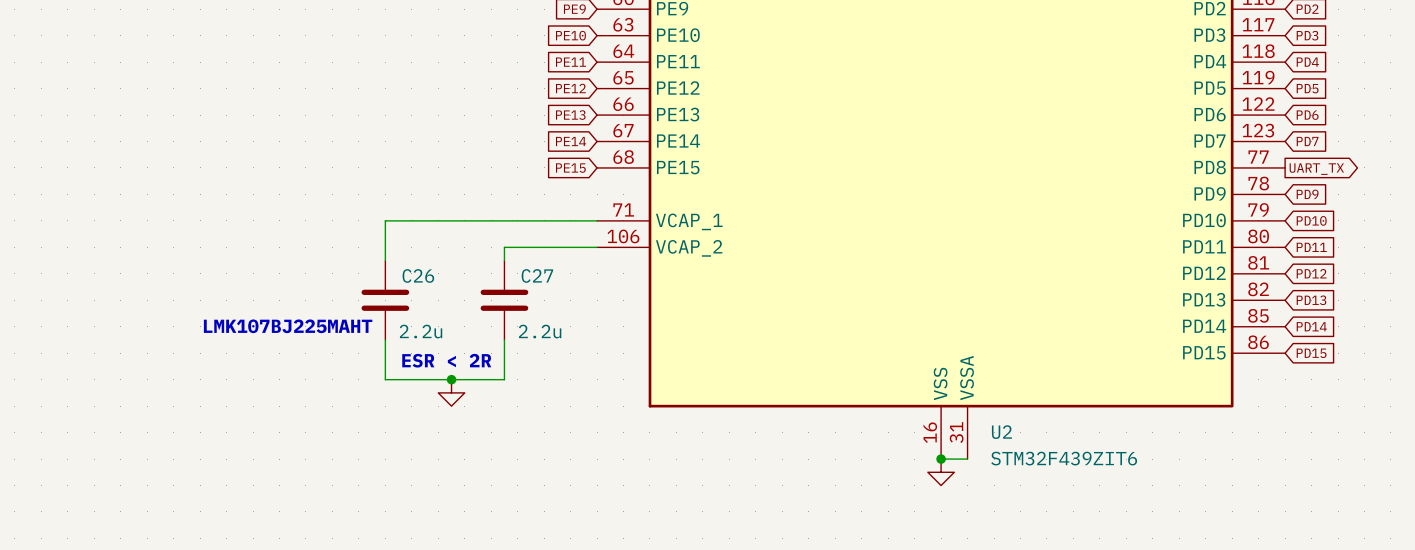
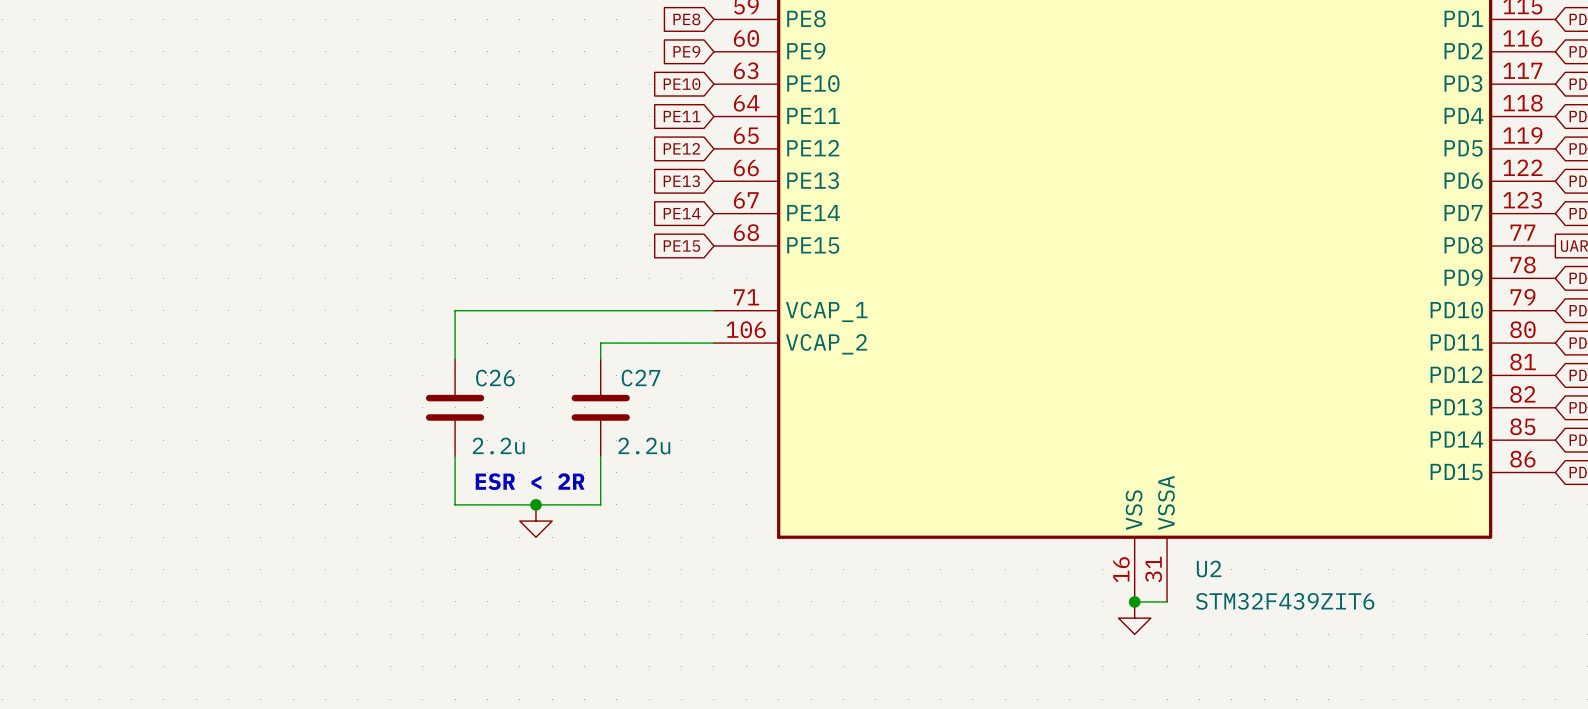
text: LMK107BJ225MAHT (288, 326) -> none

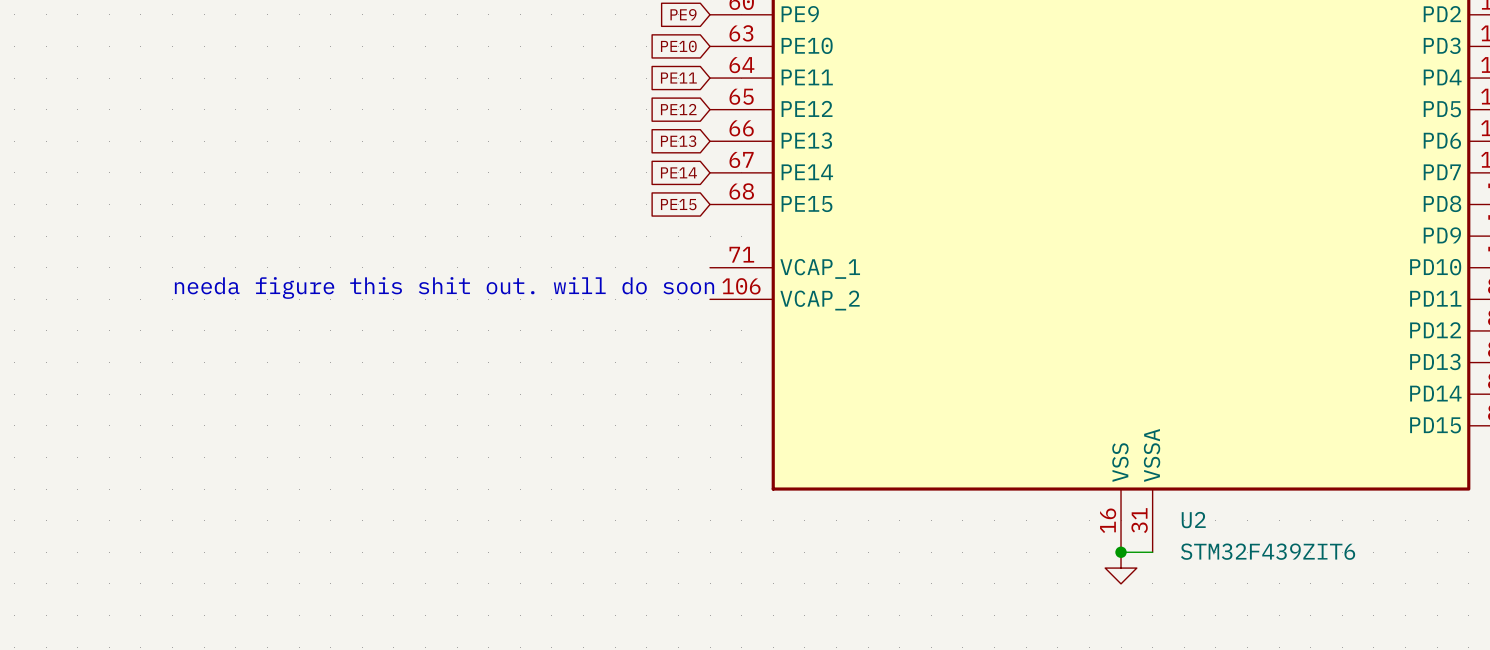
wire: (713, 310) (455, 310) (455, 359) -> none
text: none -> needa figure this shit out. will do soon (444, 287)
wire: (713, 343) (600, 343) (600, 359) -> none
C26: 2.2u (455, 407) -> none
C27: 2.2u (600, 407) -> none
wire: (455, 456) (455, 504) (600, 504) (600, 456) -> none
text: ESR < 2R (530, 481) -> none
junction: (535, 504) -> none
power symbol: (535, 521) -> none

